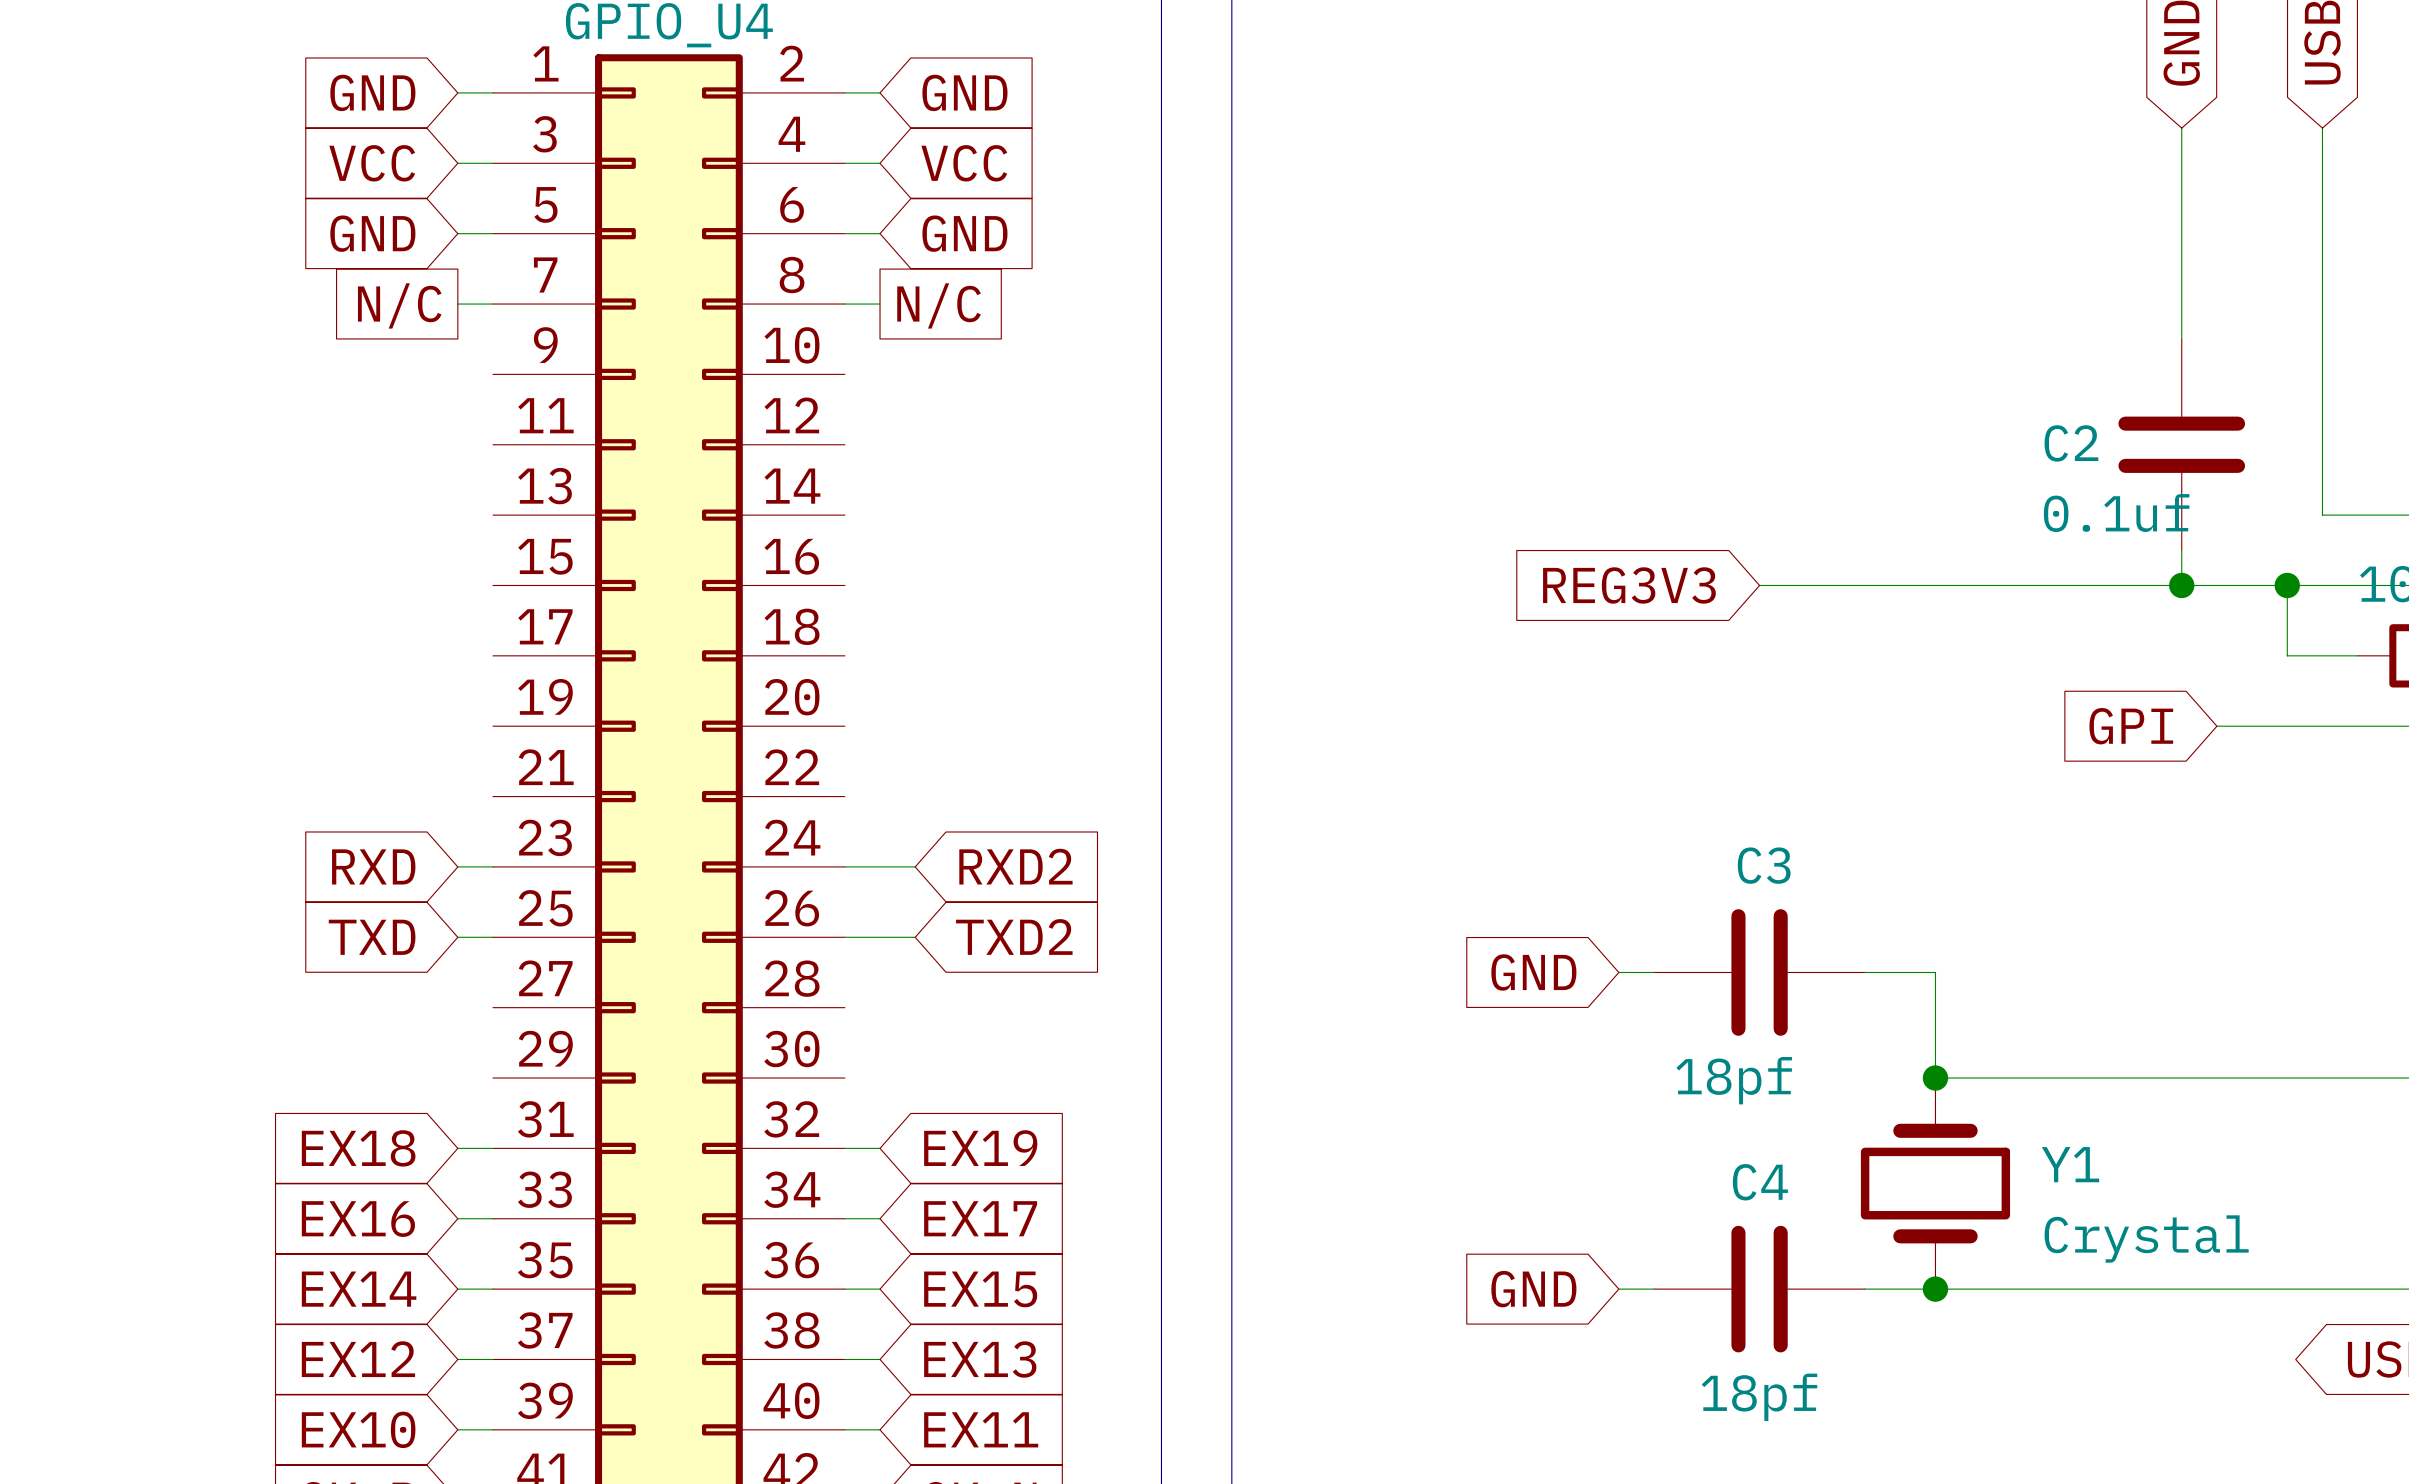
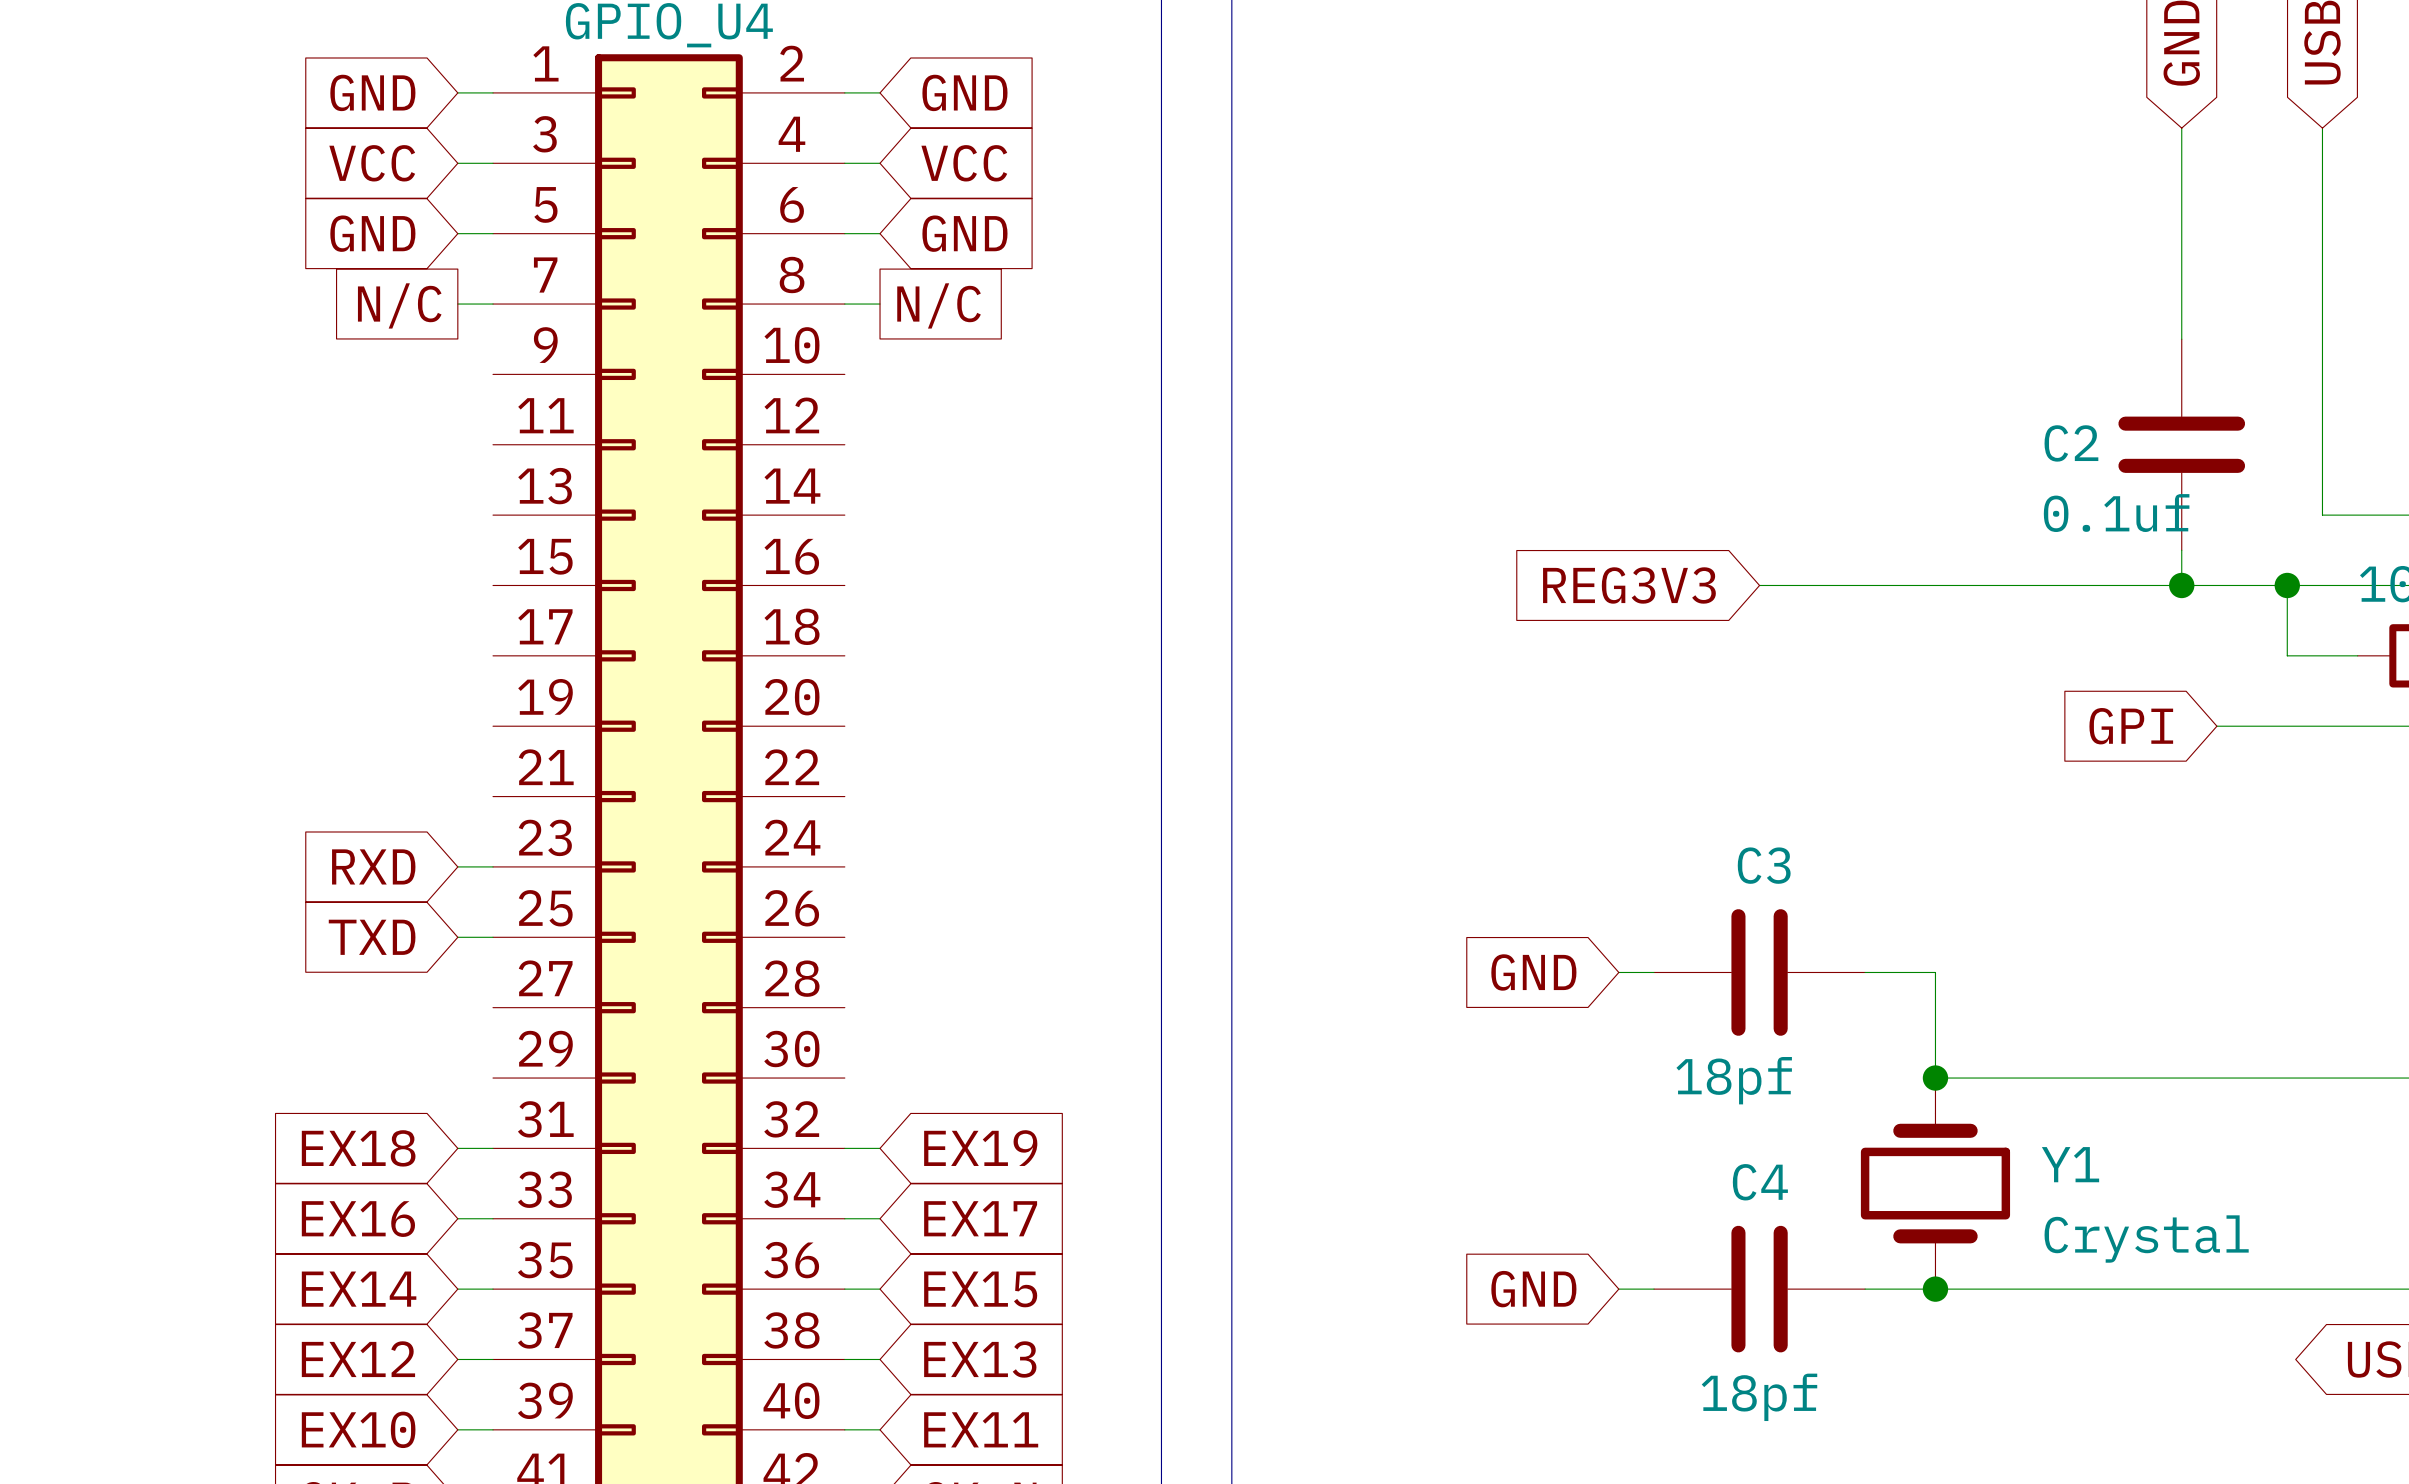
wire: (844, 866) (915, 866) -> none
global label: RXD2 (1015, 866) -> none
global label: TXD2 (1014, 936) -> none
wire: (844, 937) (915, 937) -> none

